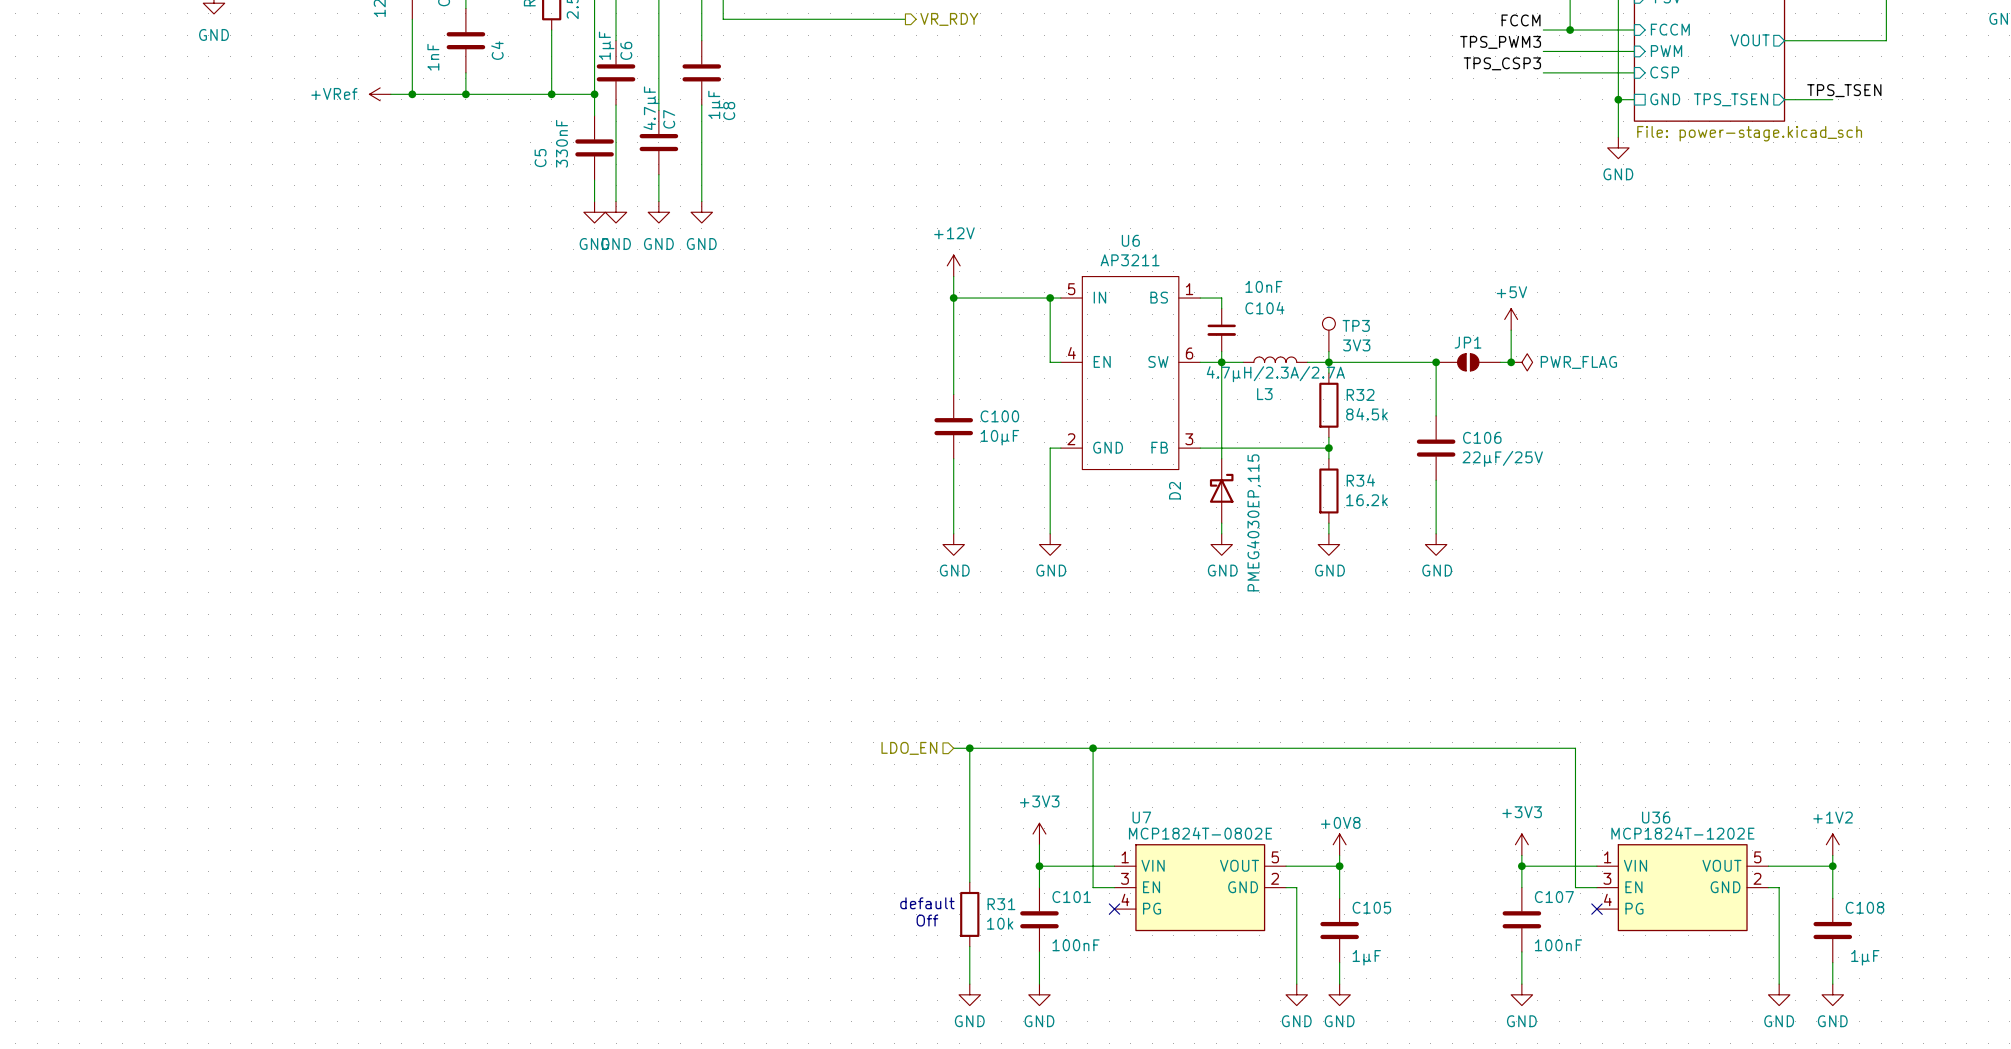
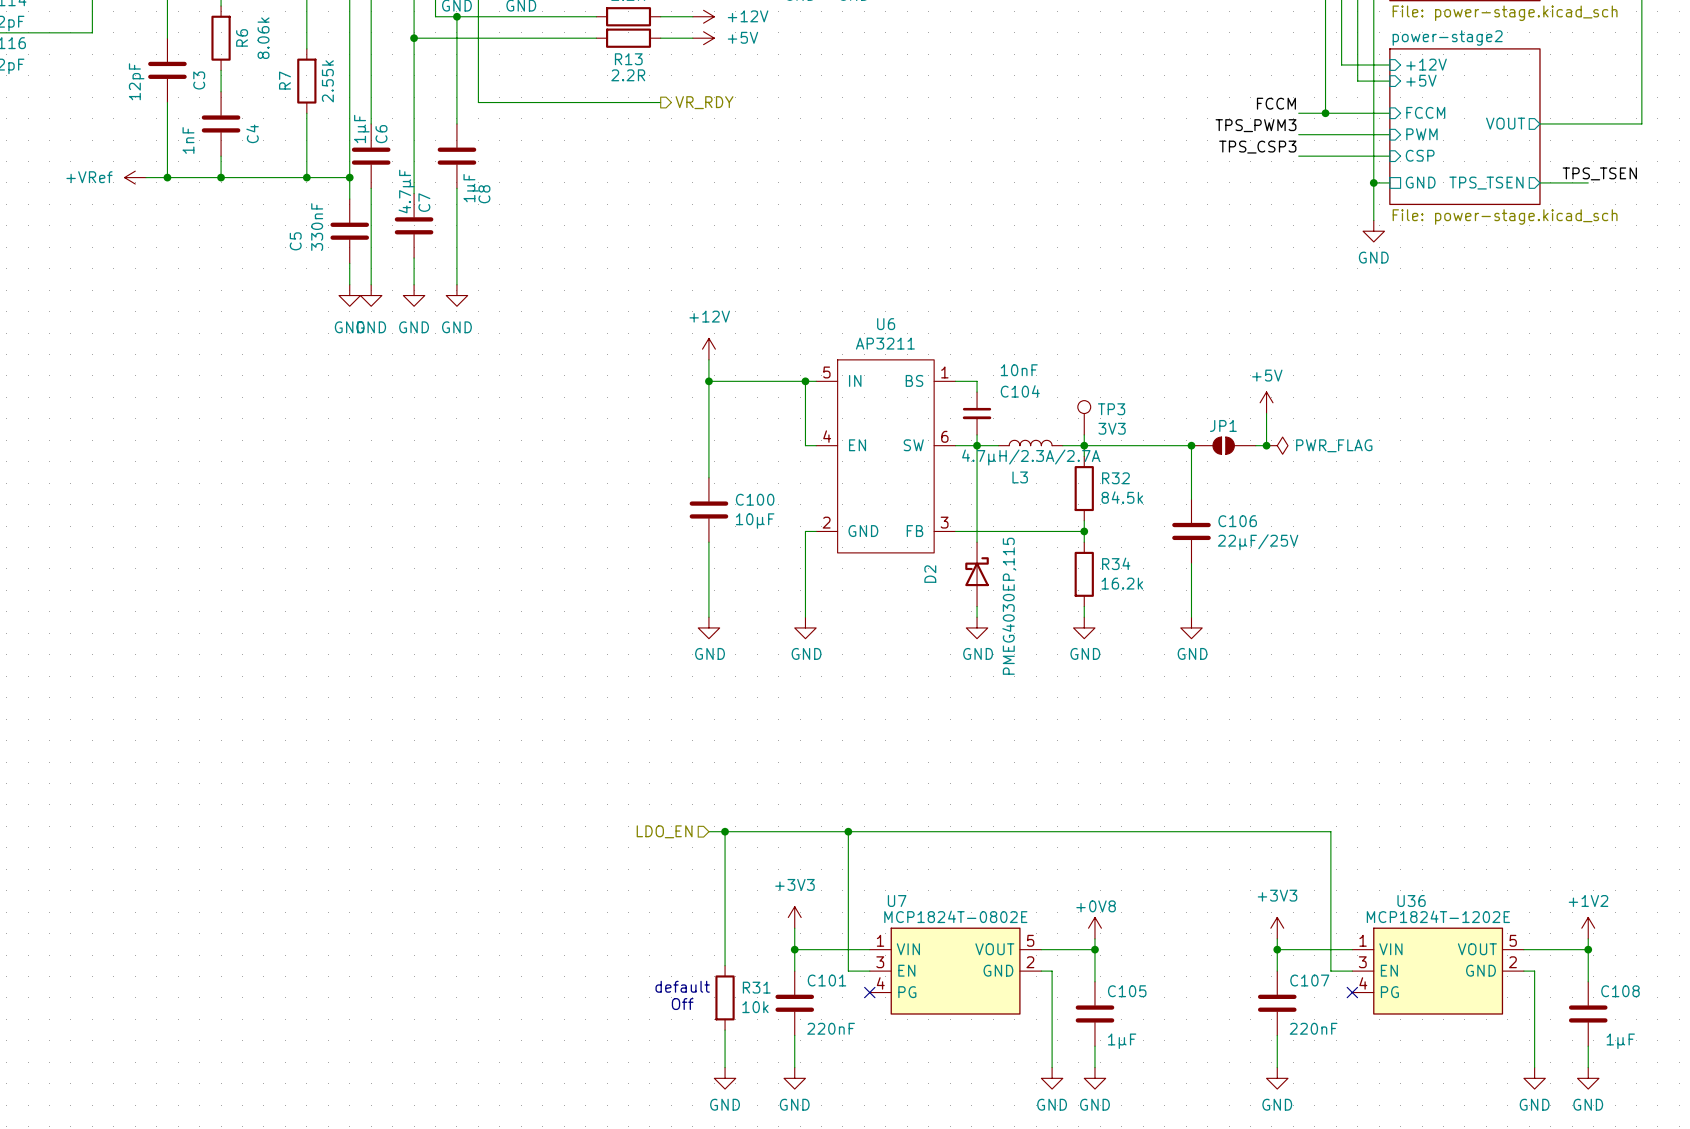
C101 value: 100nF (1076, 945) -> 220nF (831, 1028)
C107 value: 100nF (1558, 945) -> 220nF (1313, 1028)

